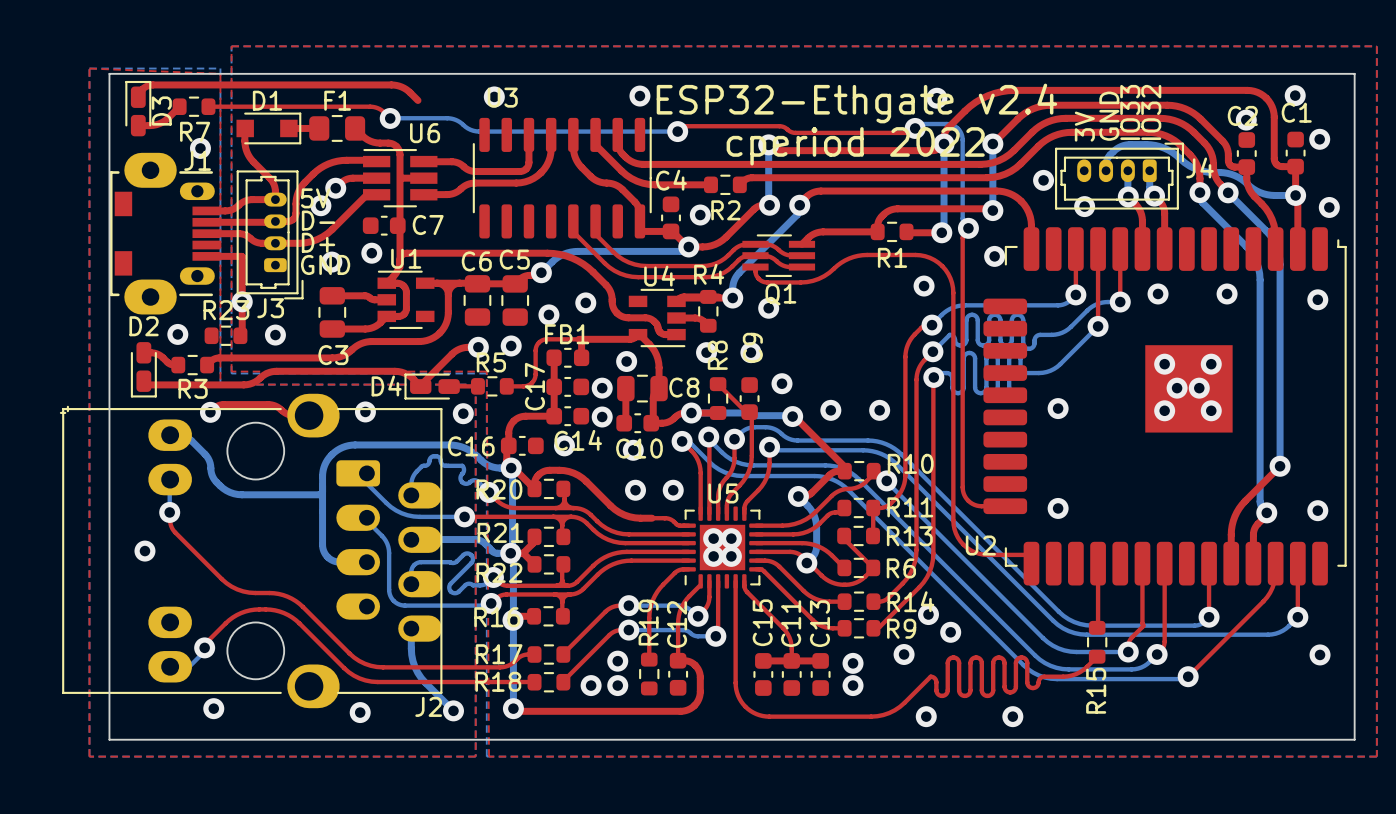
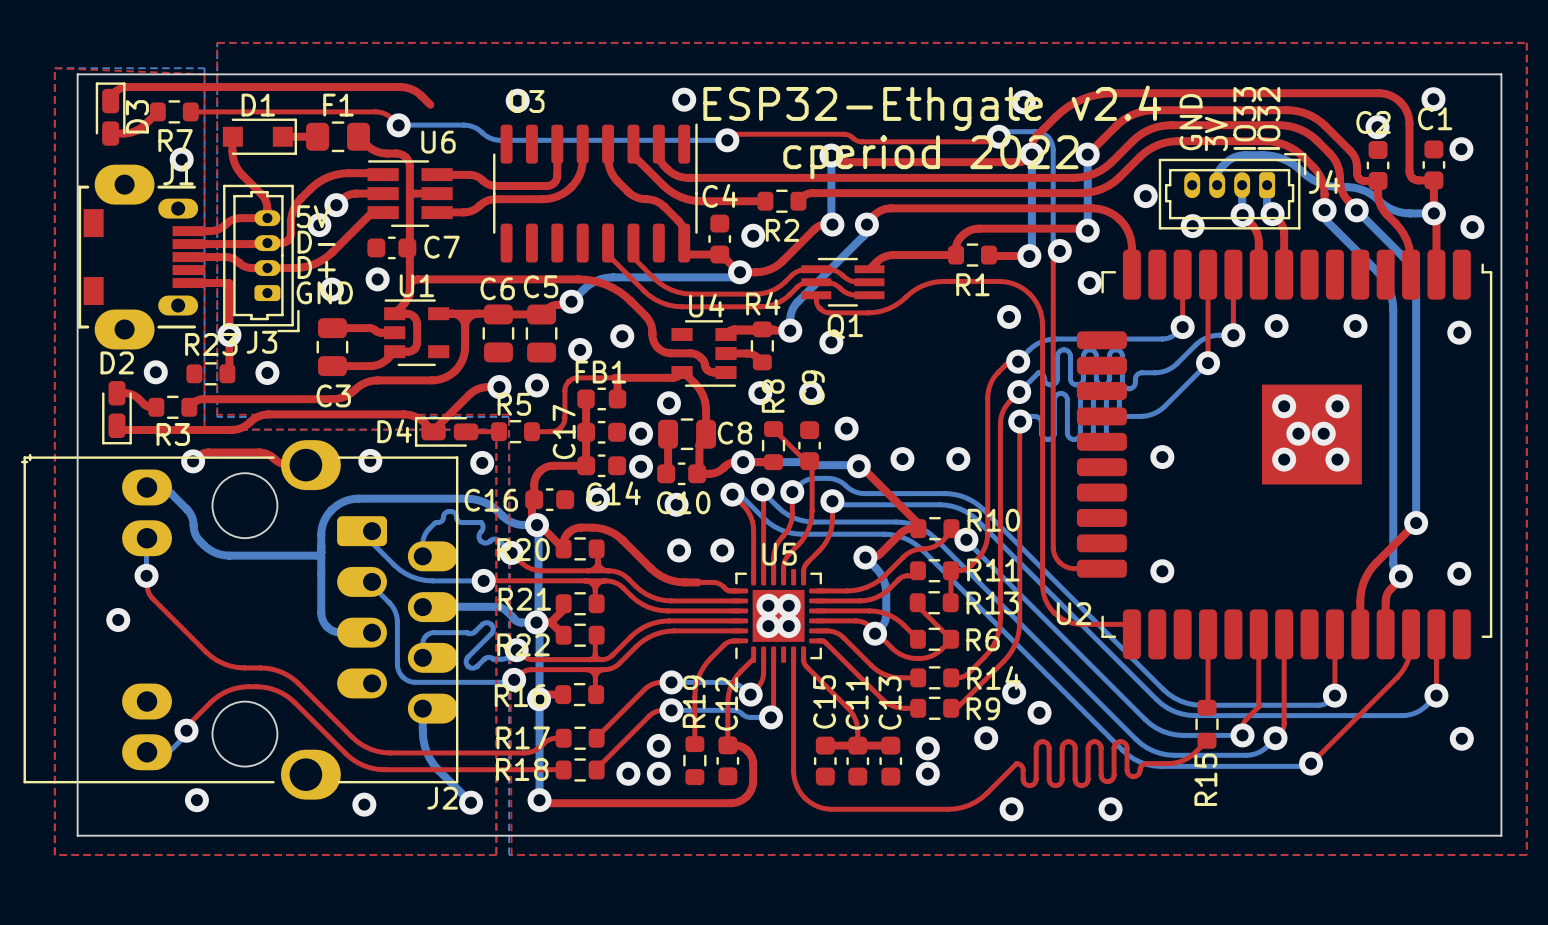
text: GND (1109, 116) -> 3V (1216, 134)
text: 3V (1084, 126) -> GND (1191, 122)

